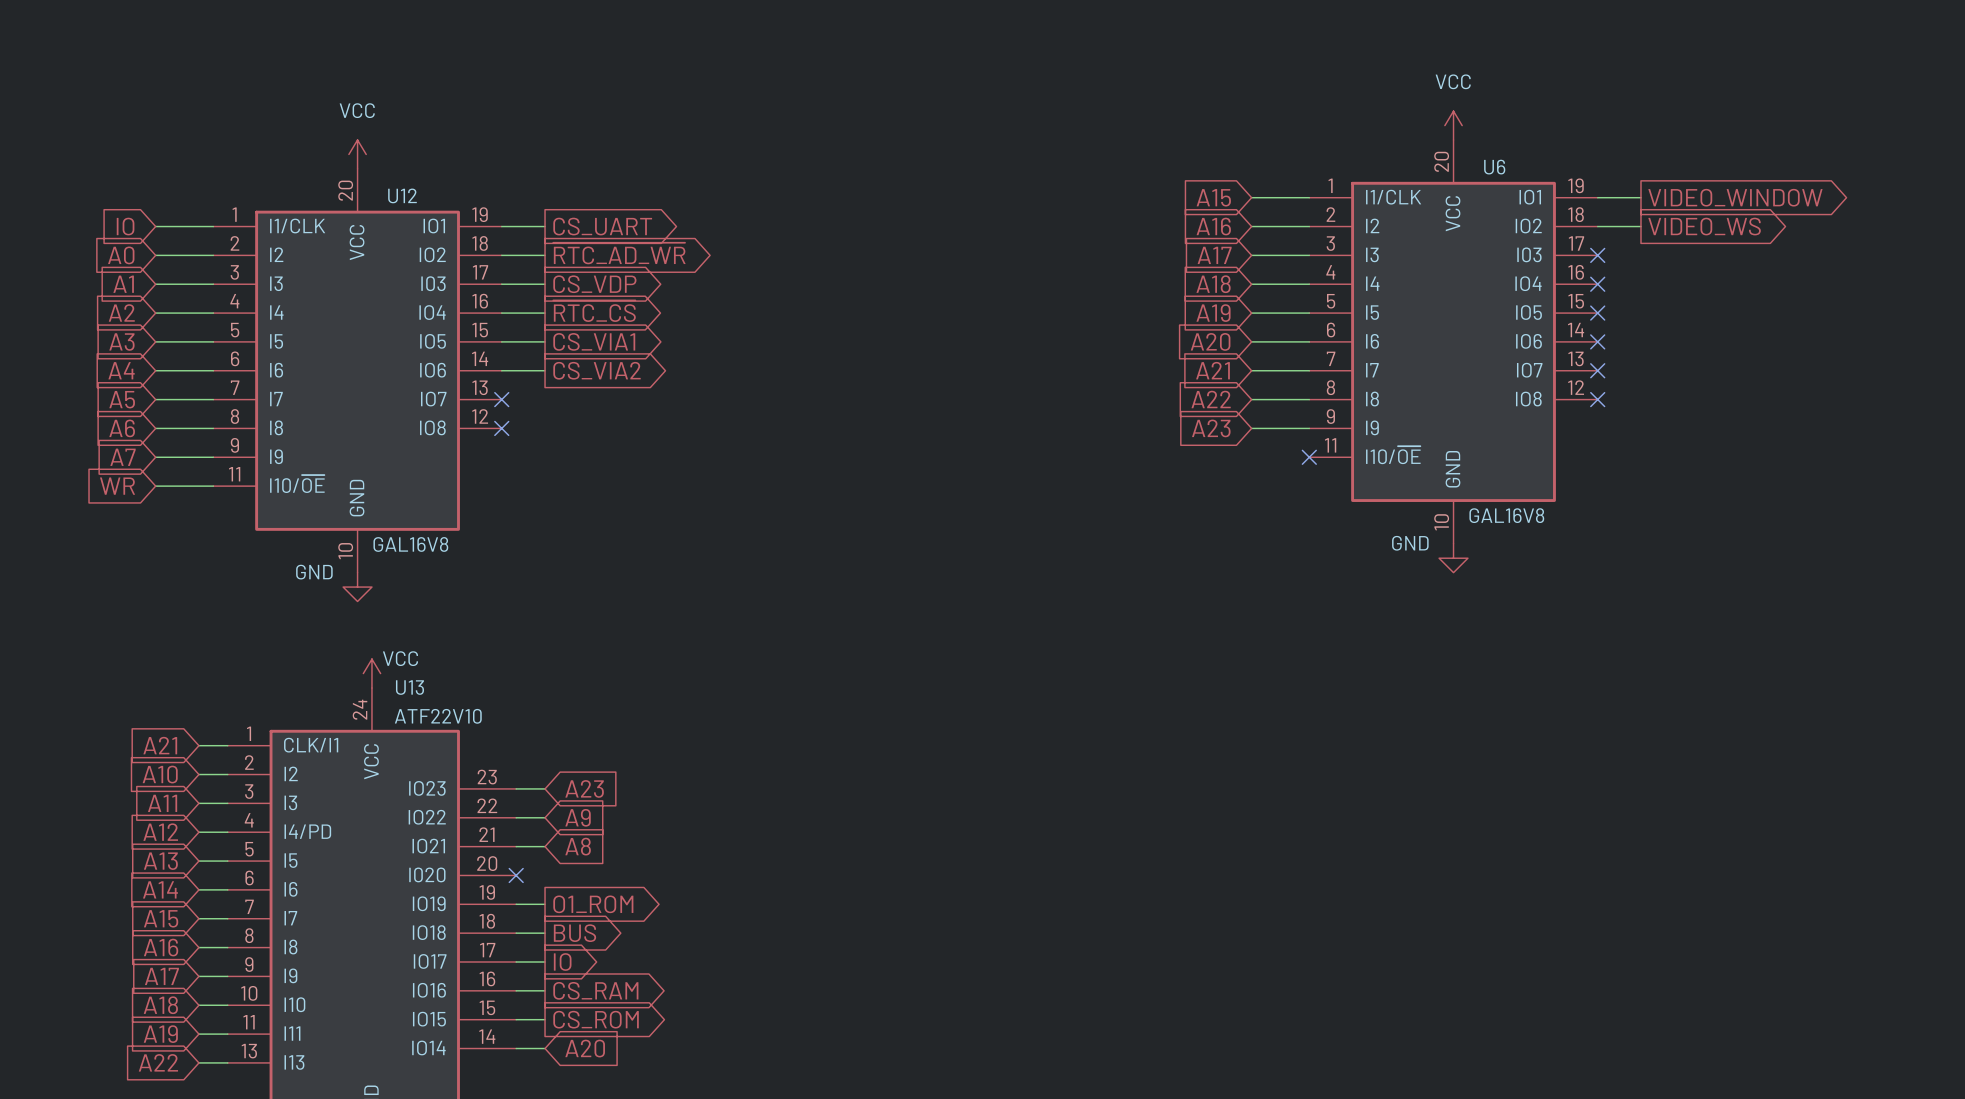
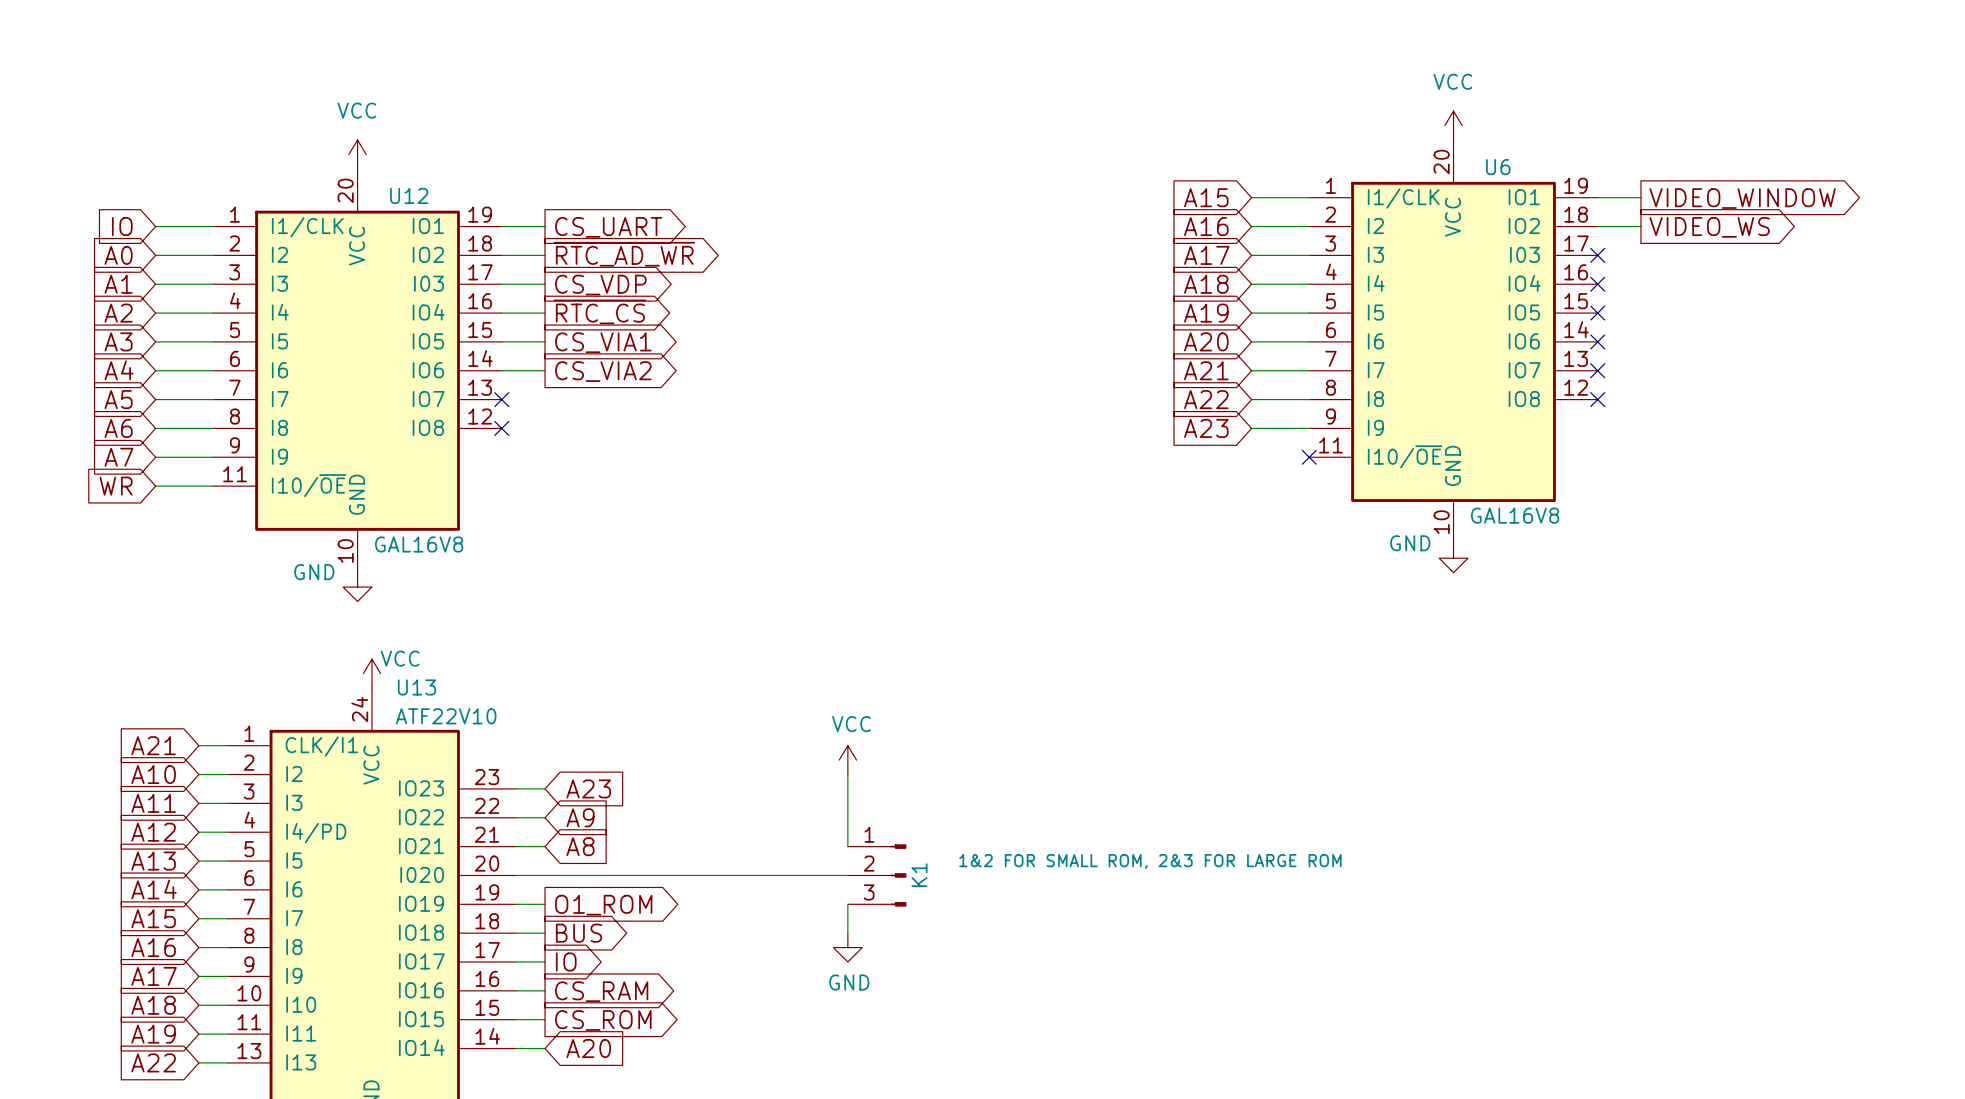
power symbol: none -> VCC (847, 760)
wire: none -> (847, 774) (847, 846)
wire: none -> (516, 875) (847, 875)
no-connect mark: (516, 875) -> none
K1: none -> 1&2 FOR SMALL ROM, 2&3 FOR LARGE ROM (877, 875)
wire: none -> (847, 904) (847, 933)
power symbol: none -> GND (847, 947)

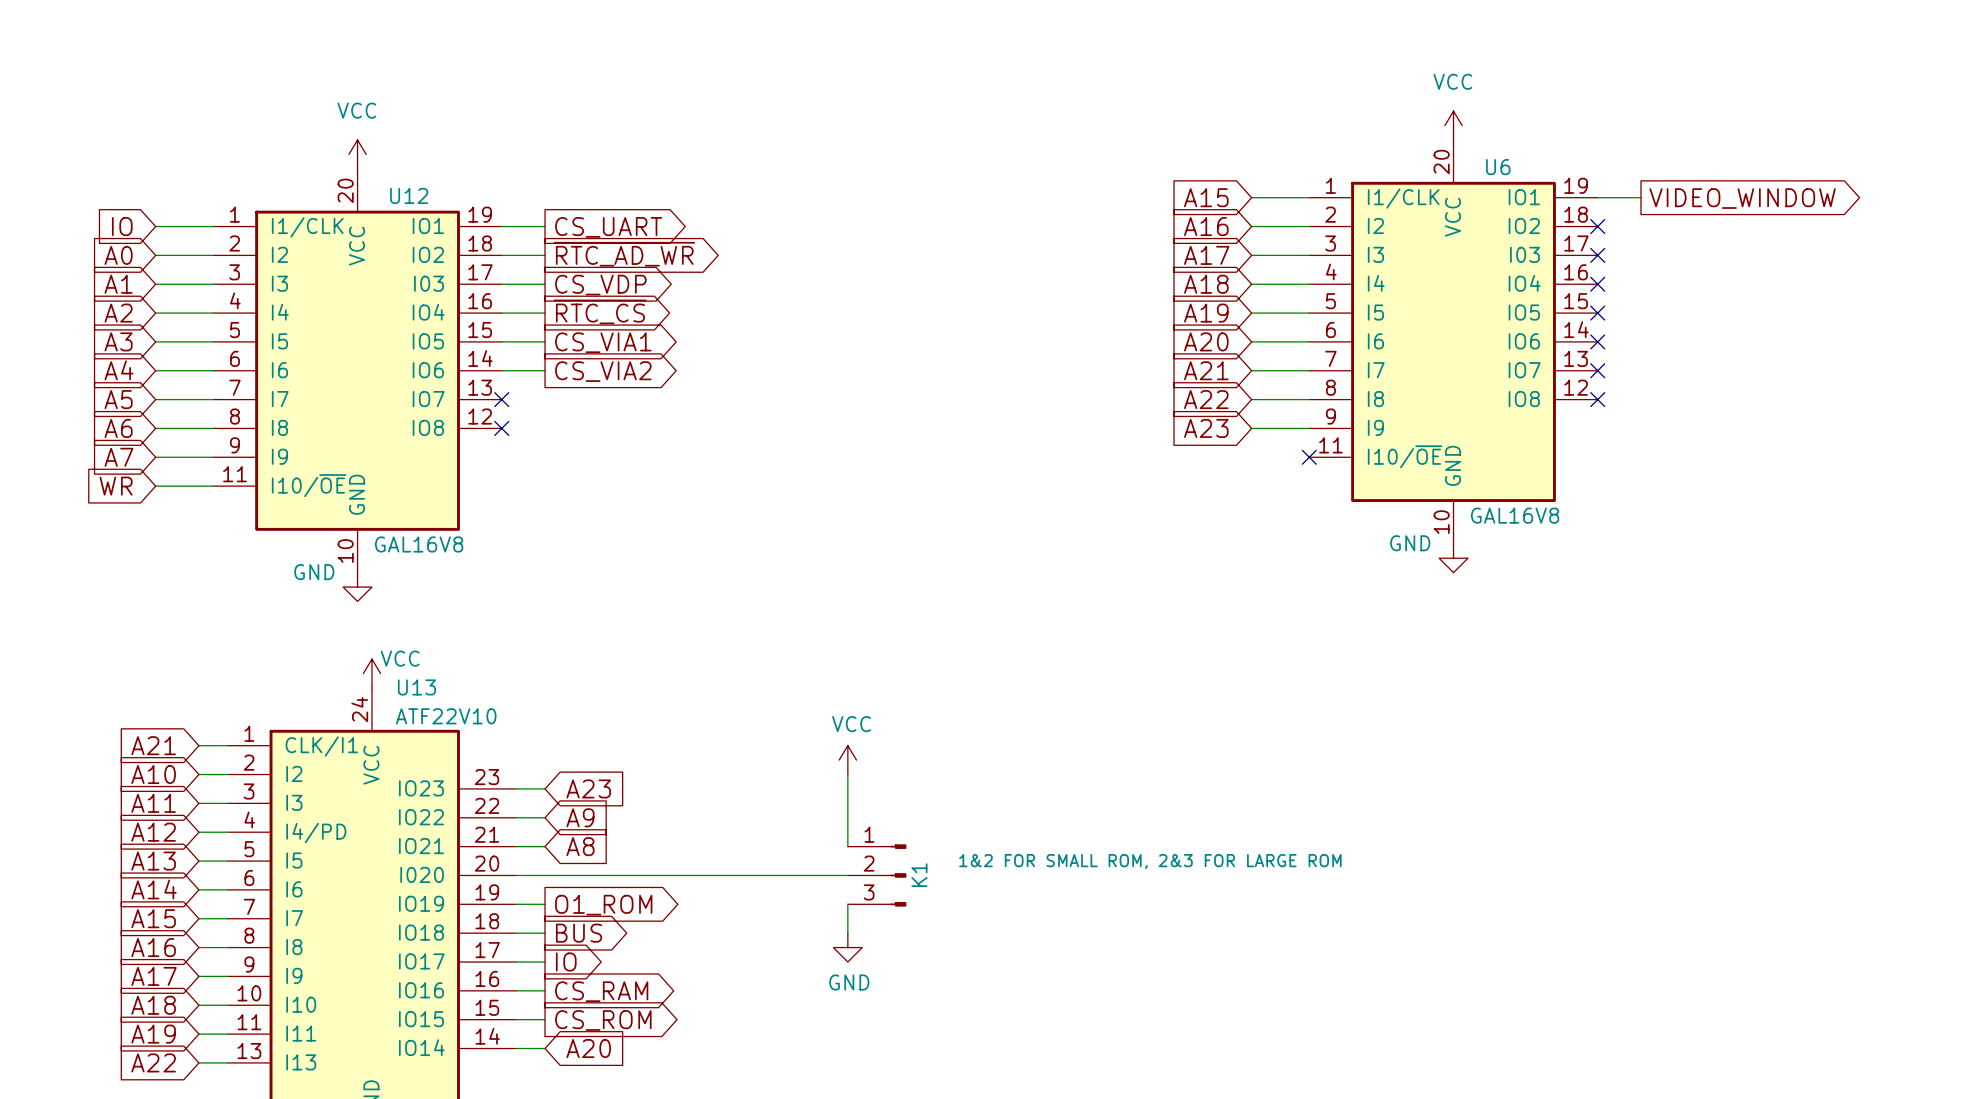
wire: (1597, 226) (1640, 226) -> none
no-connect mark: none -> (1597, 226)
global label: VIDEO_WS (1709, 227) -> none

